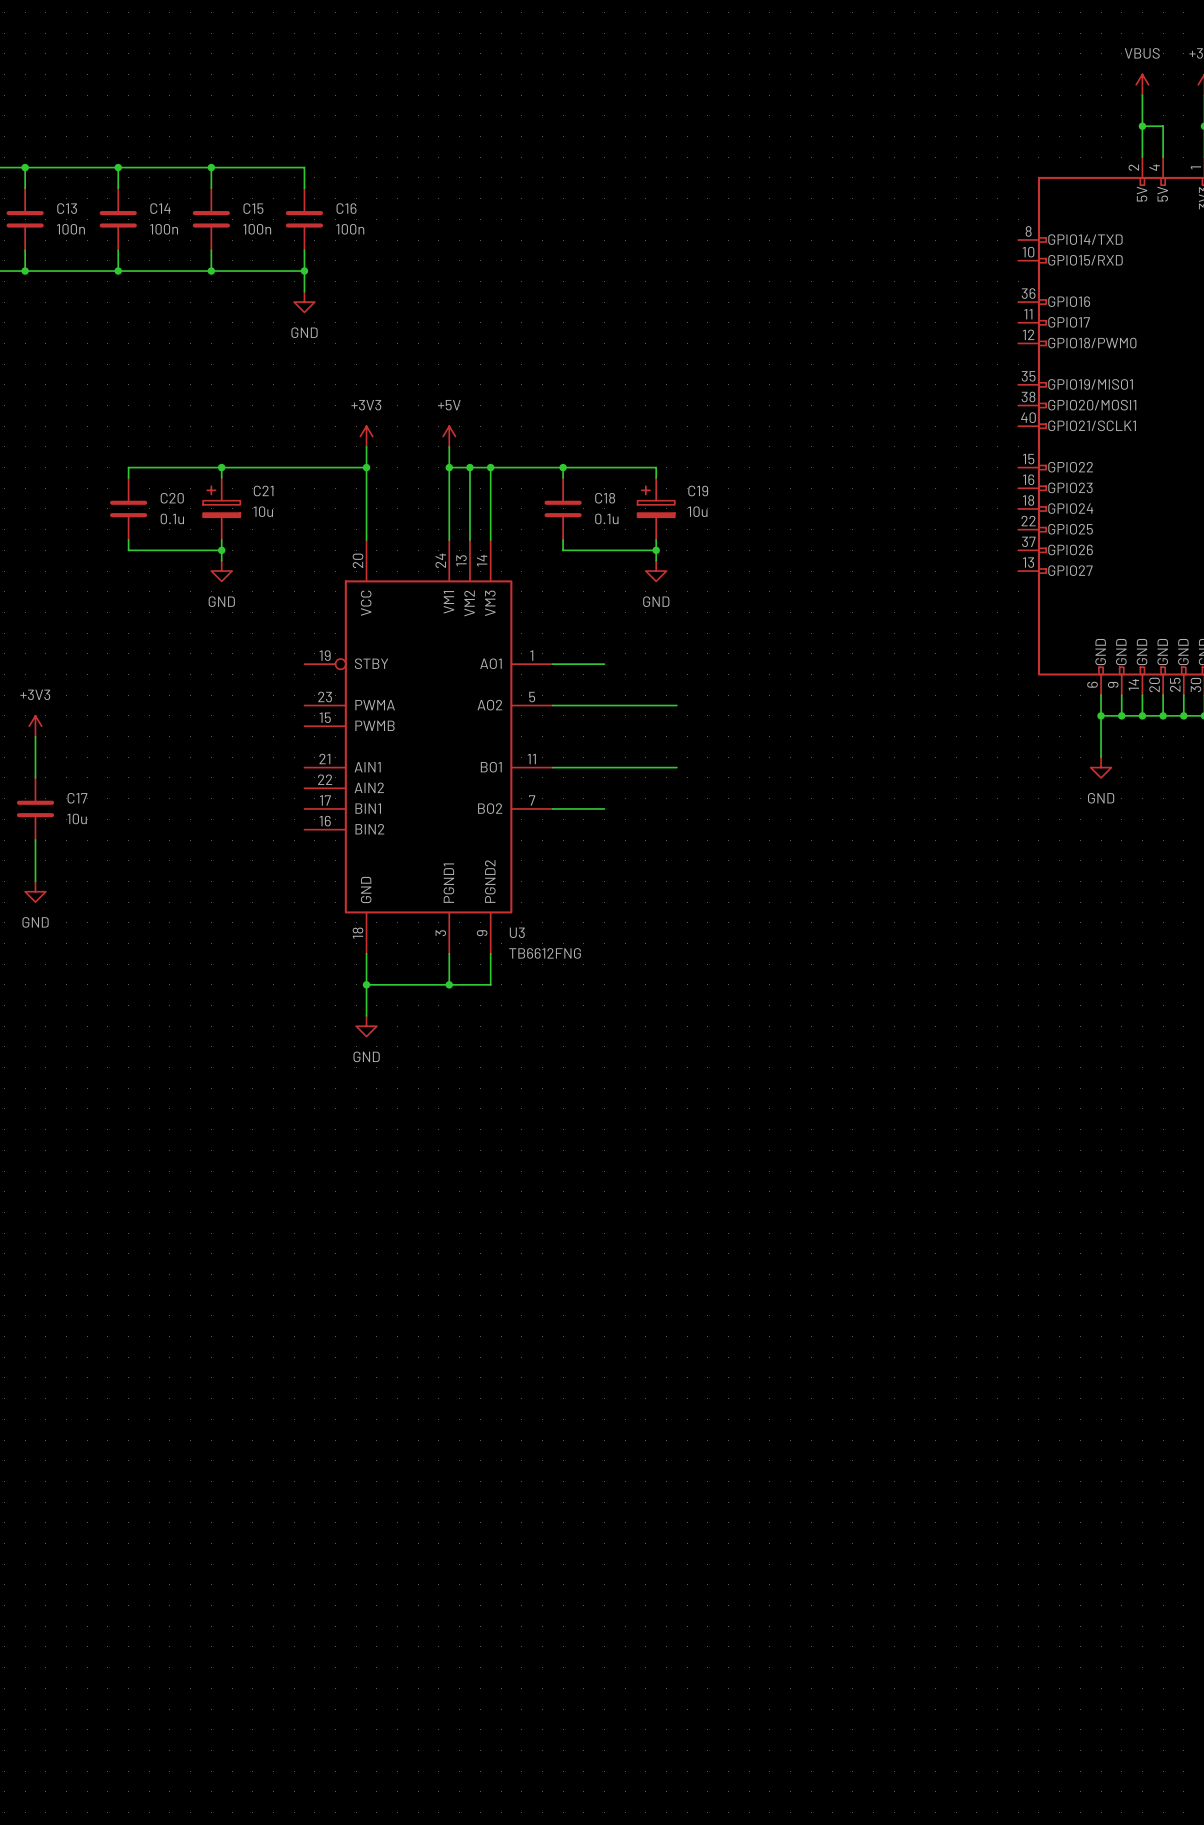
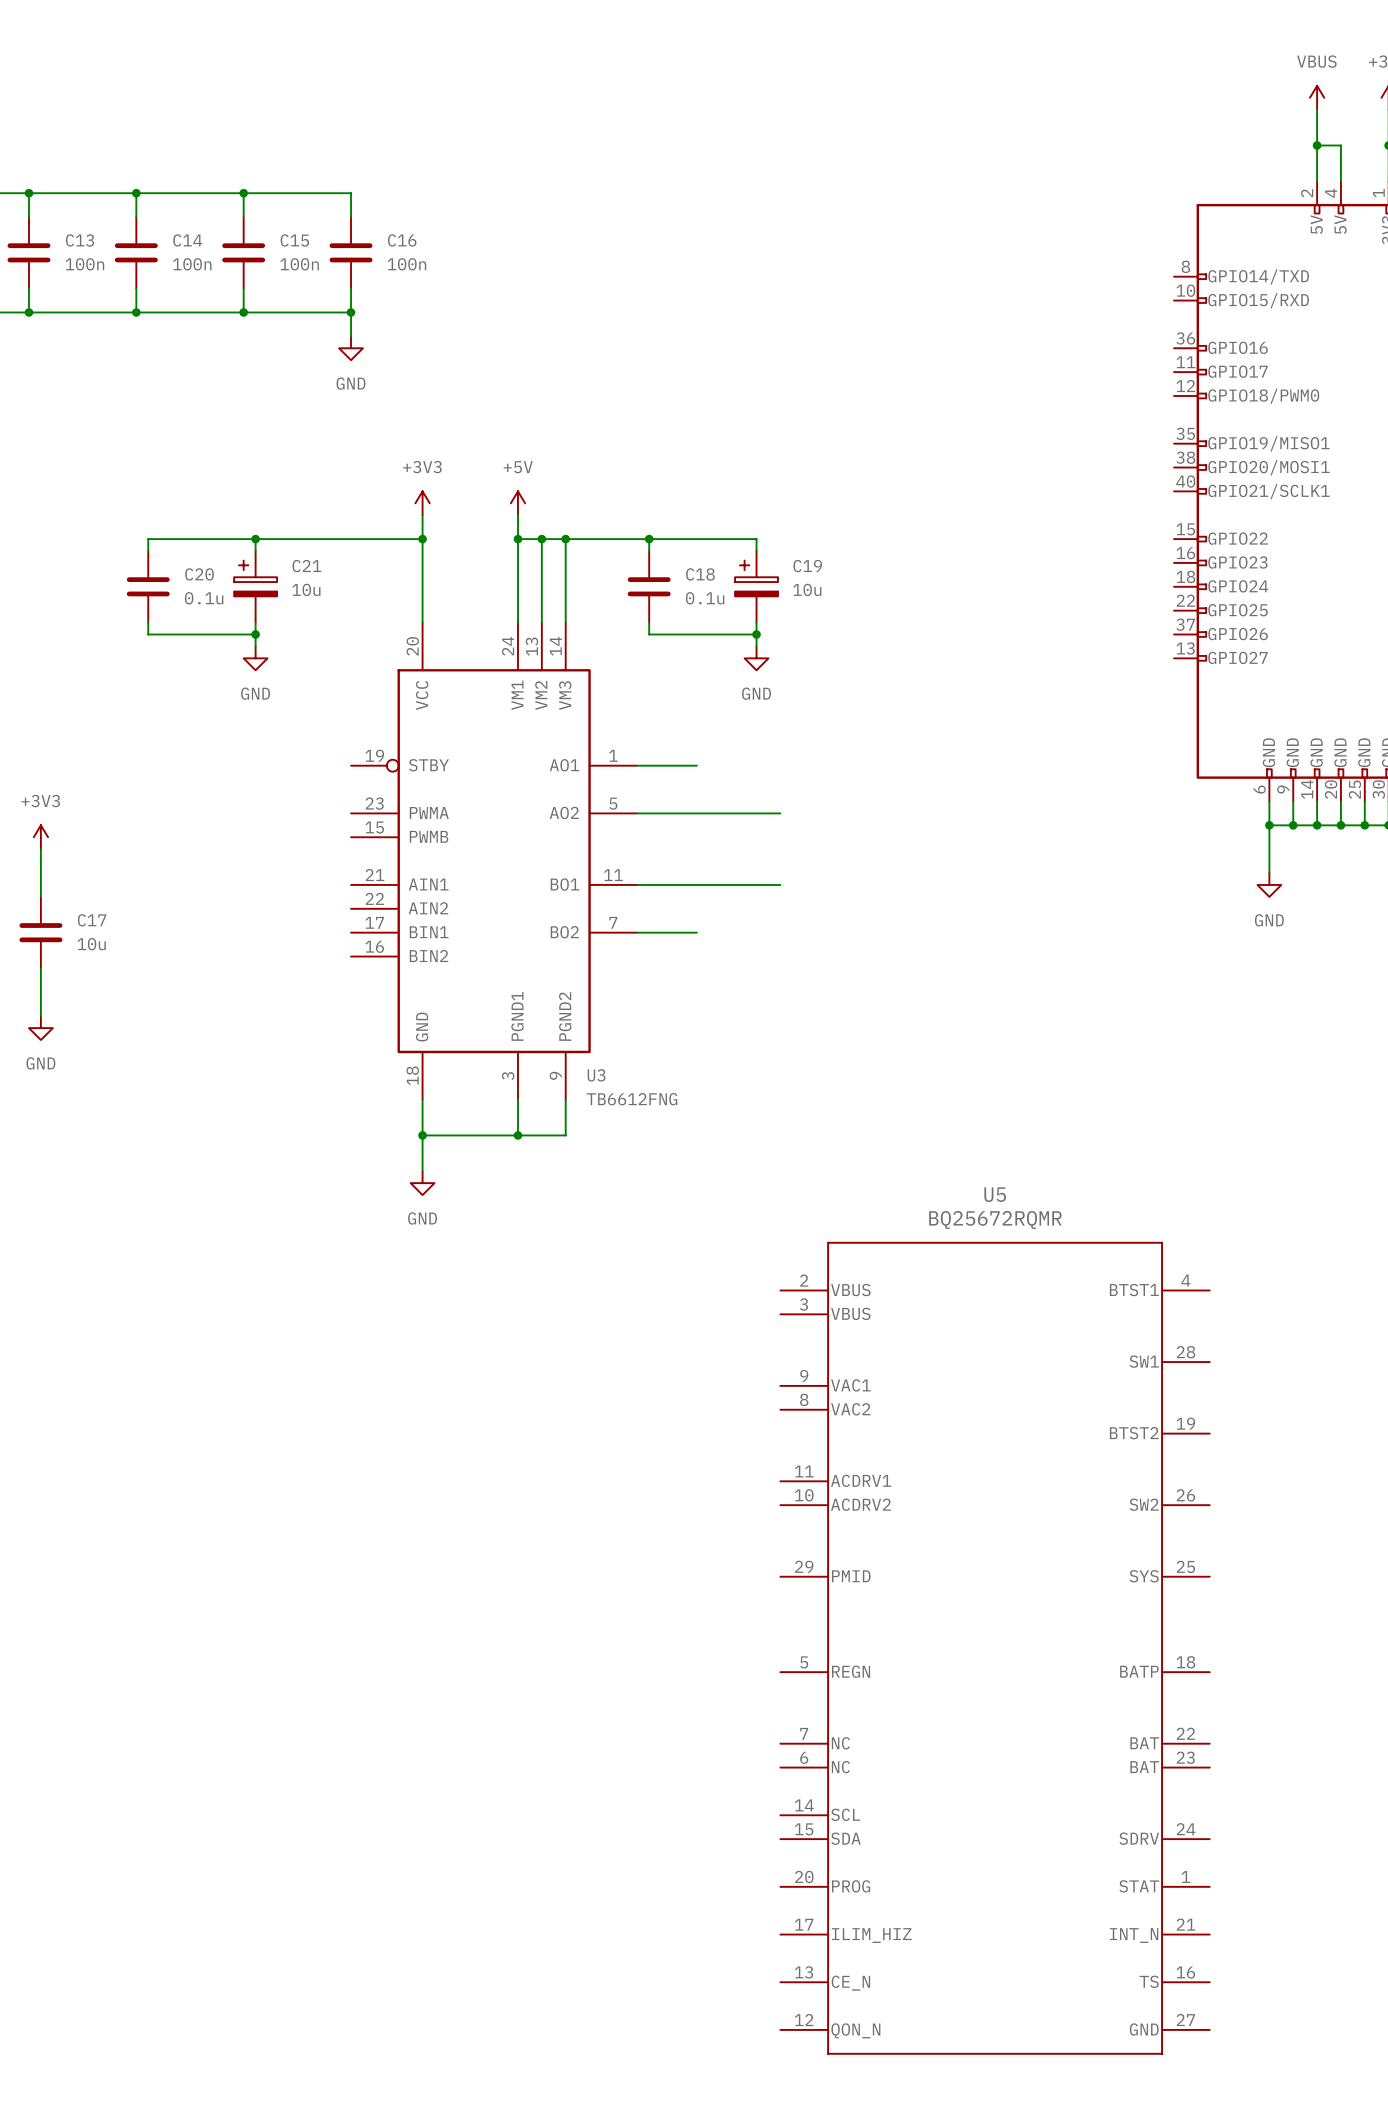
U5: none -> BQ25672RQMR (995, 1648)

